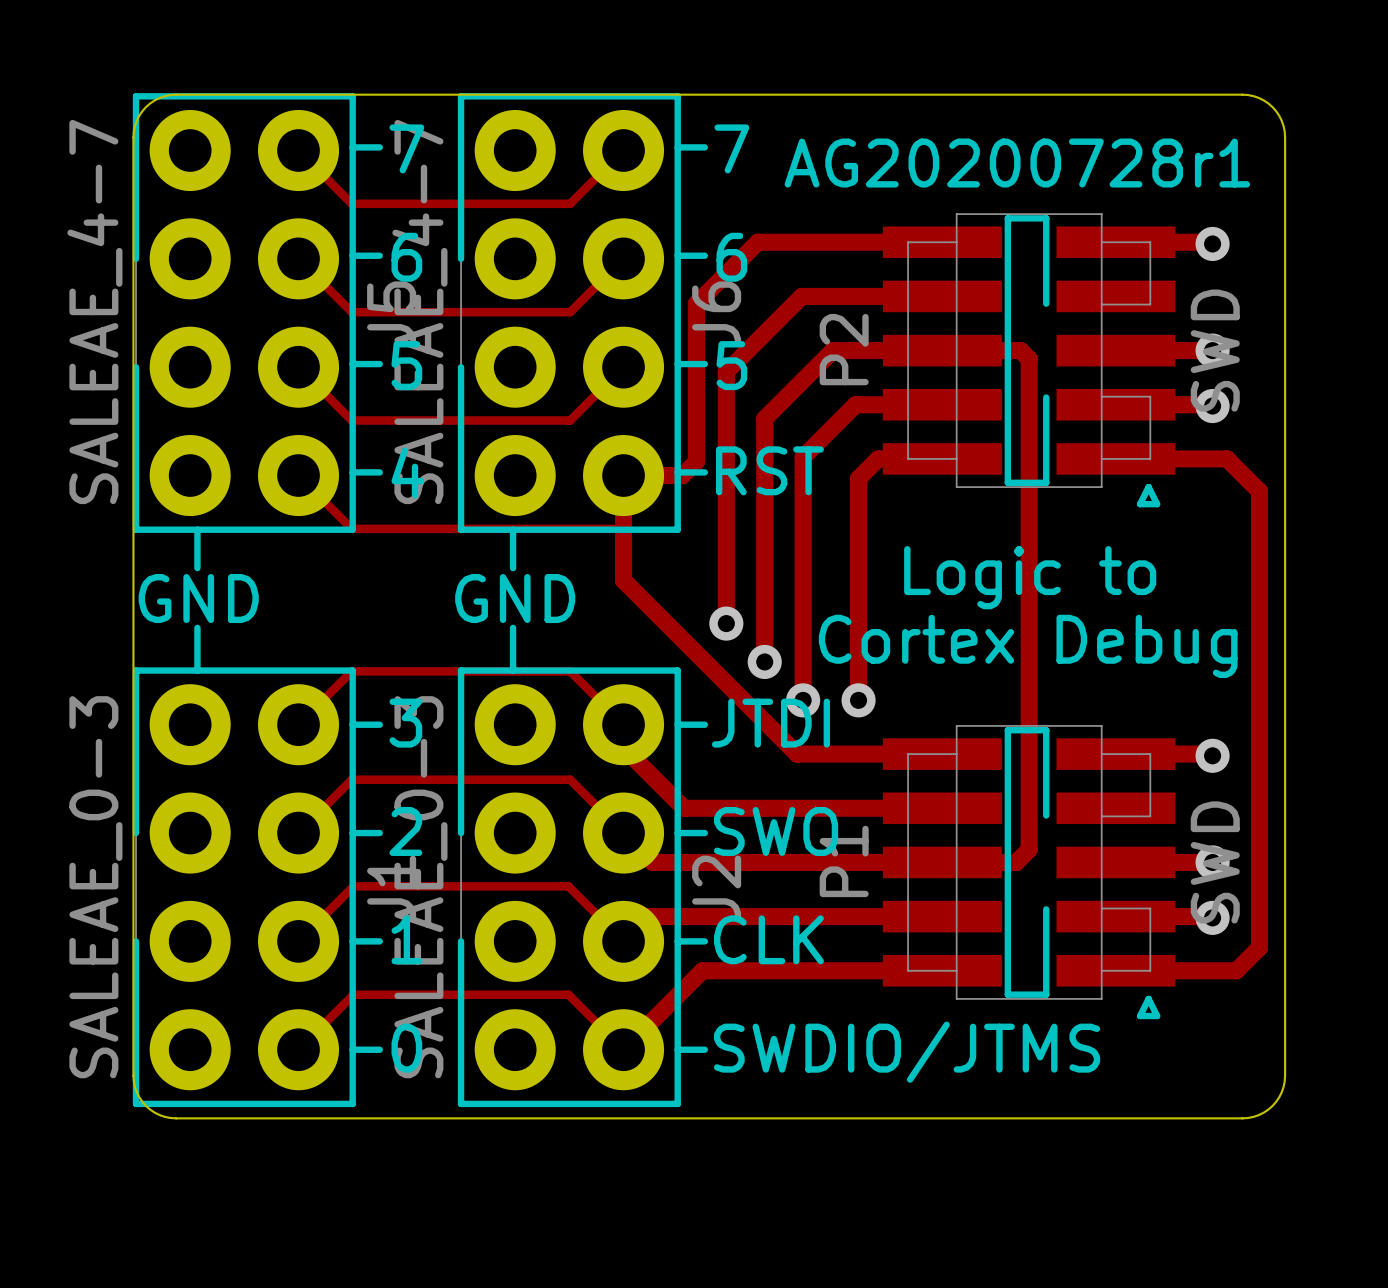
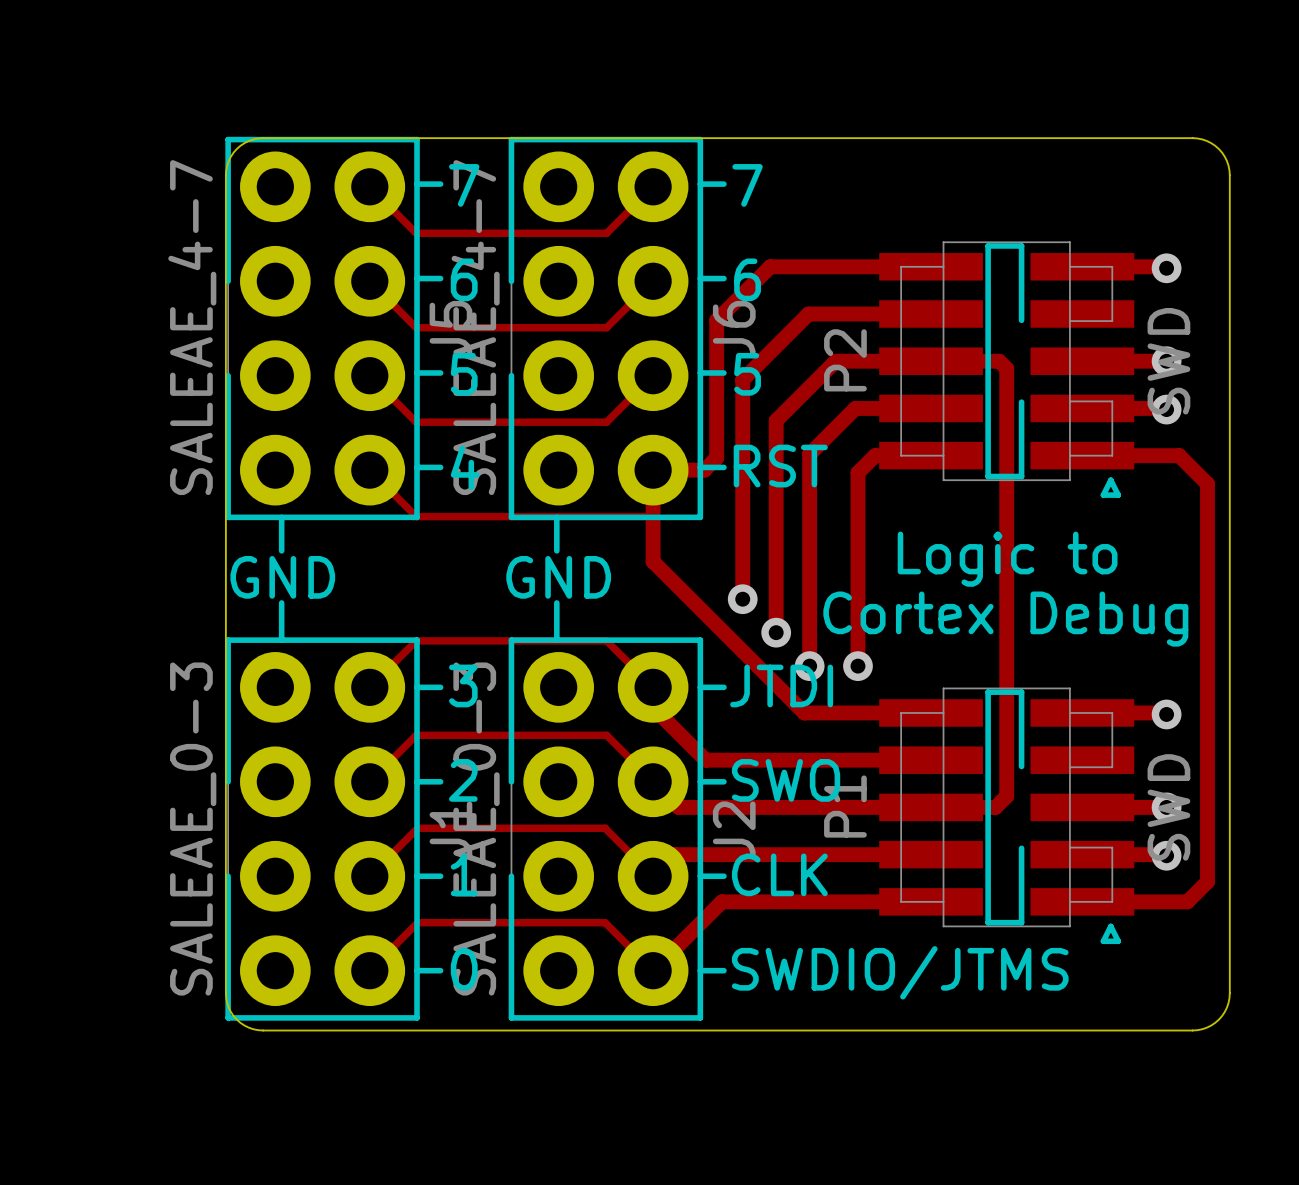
text: AG20200728r1 (1017, 163) -> none

